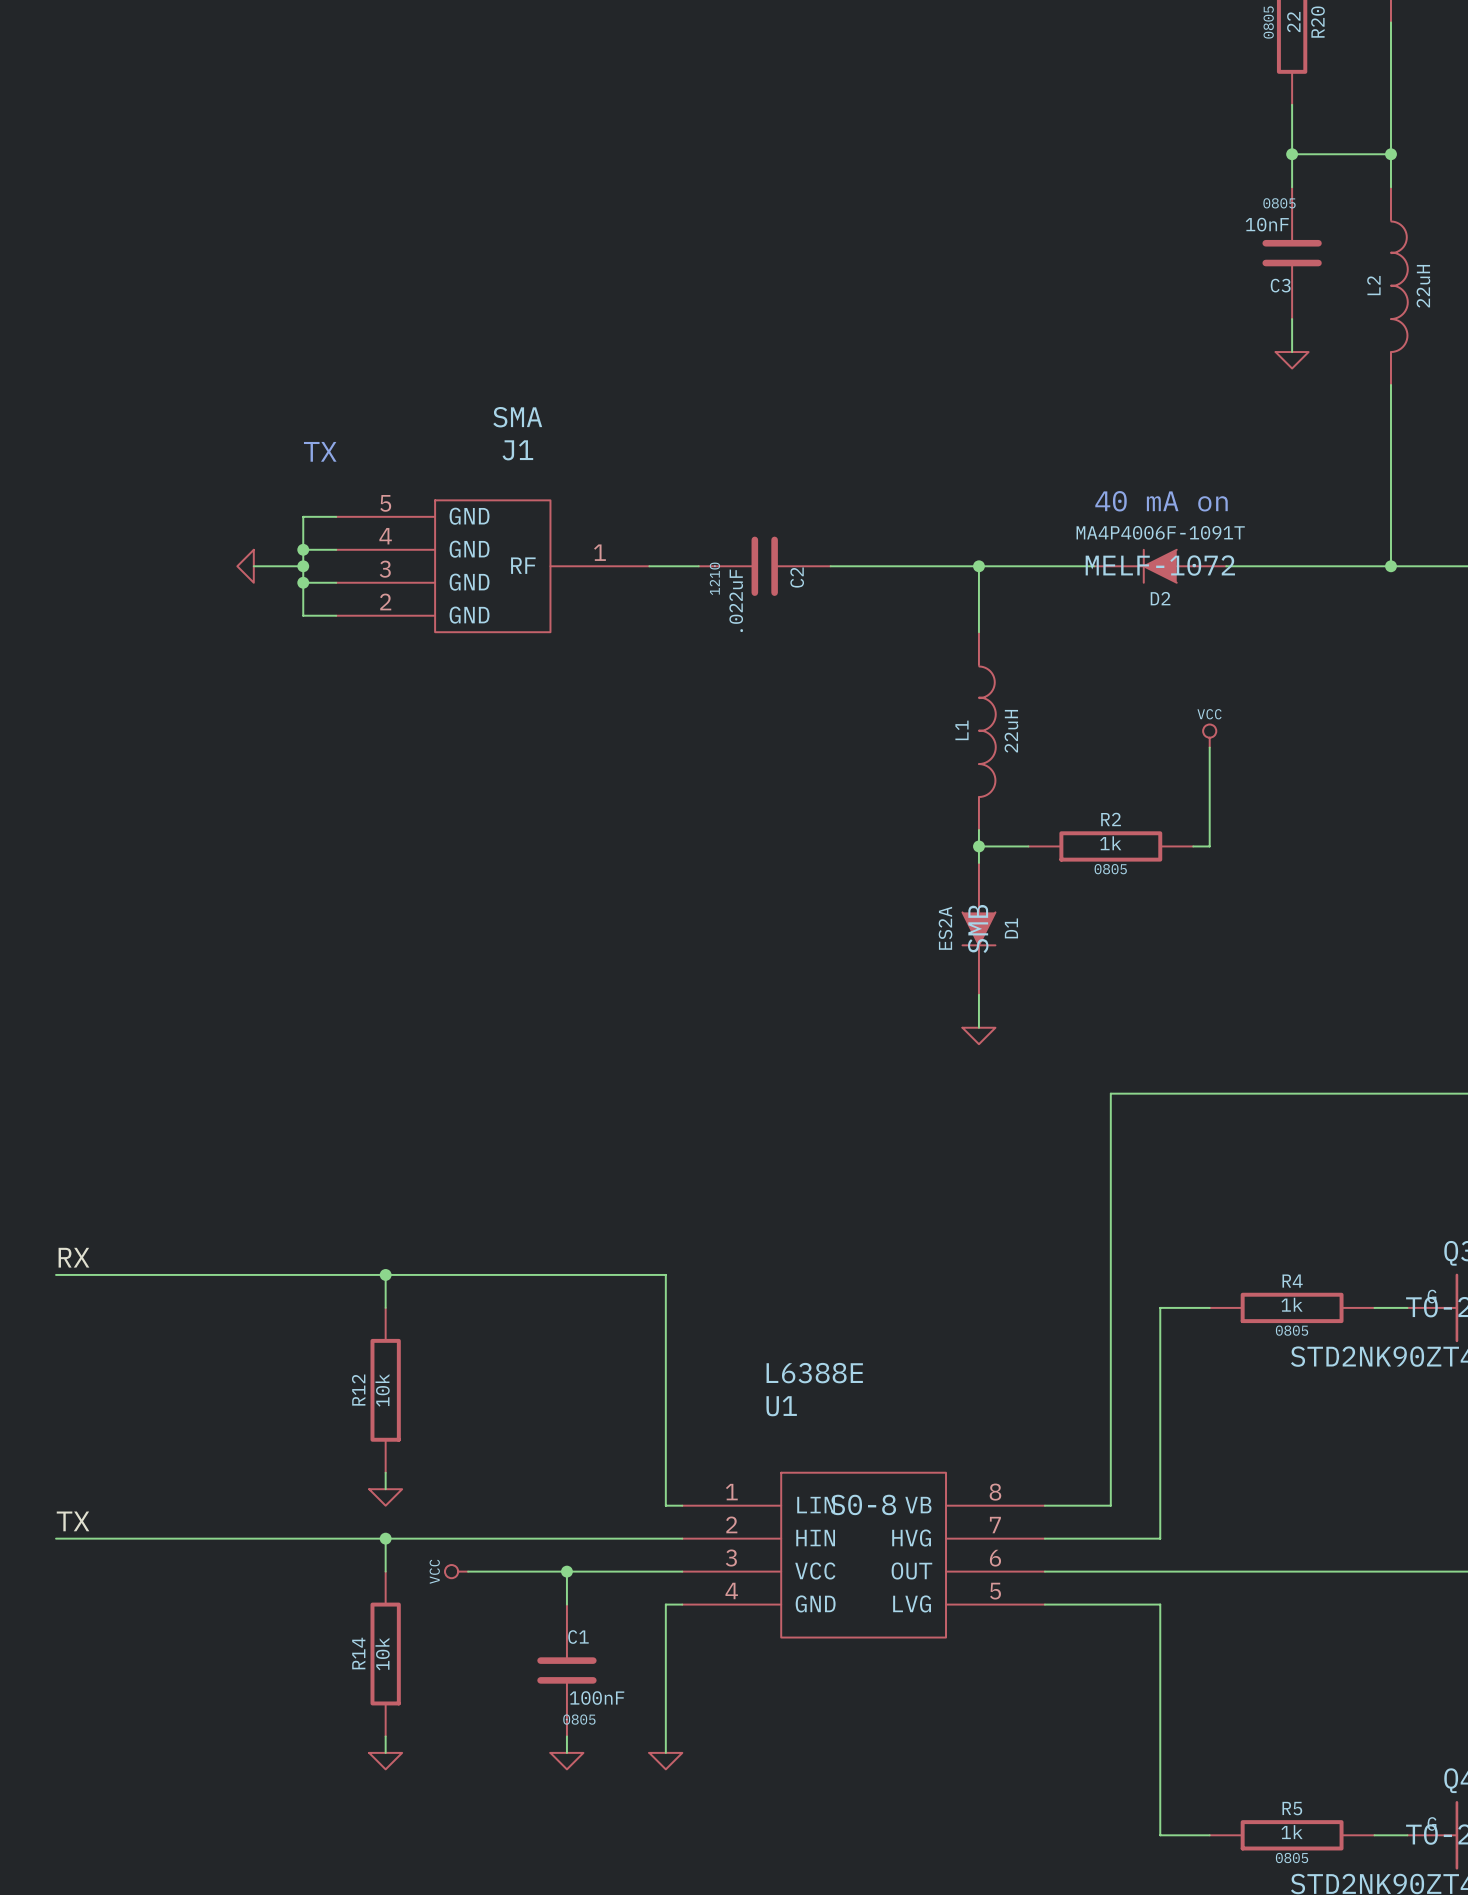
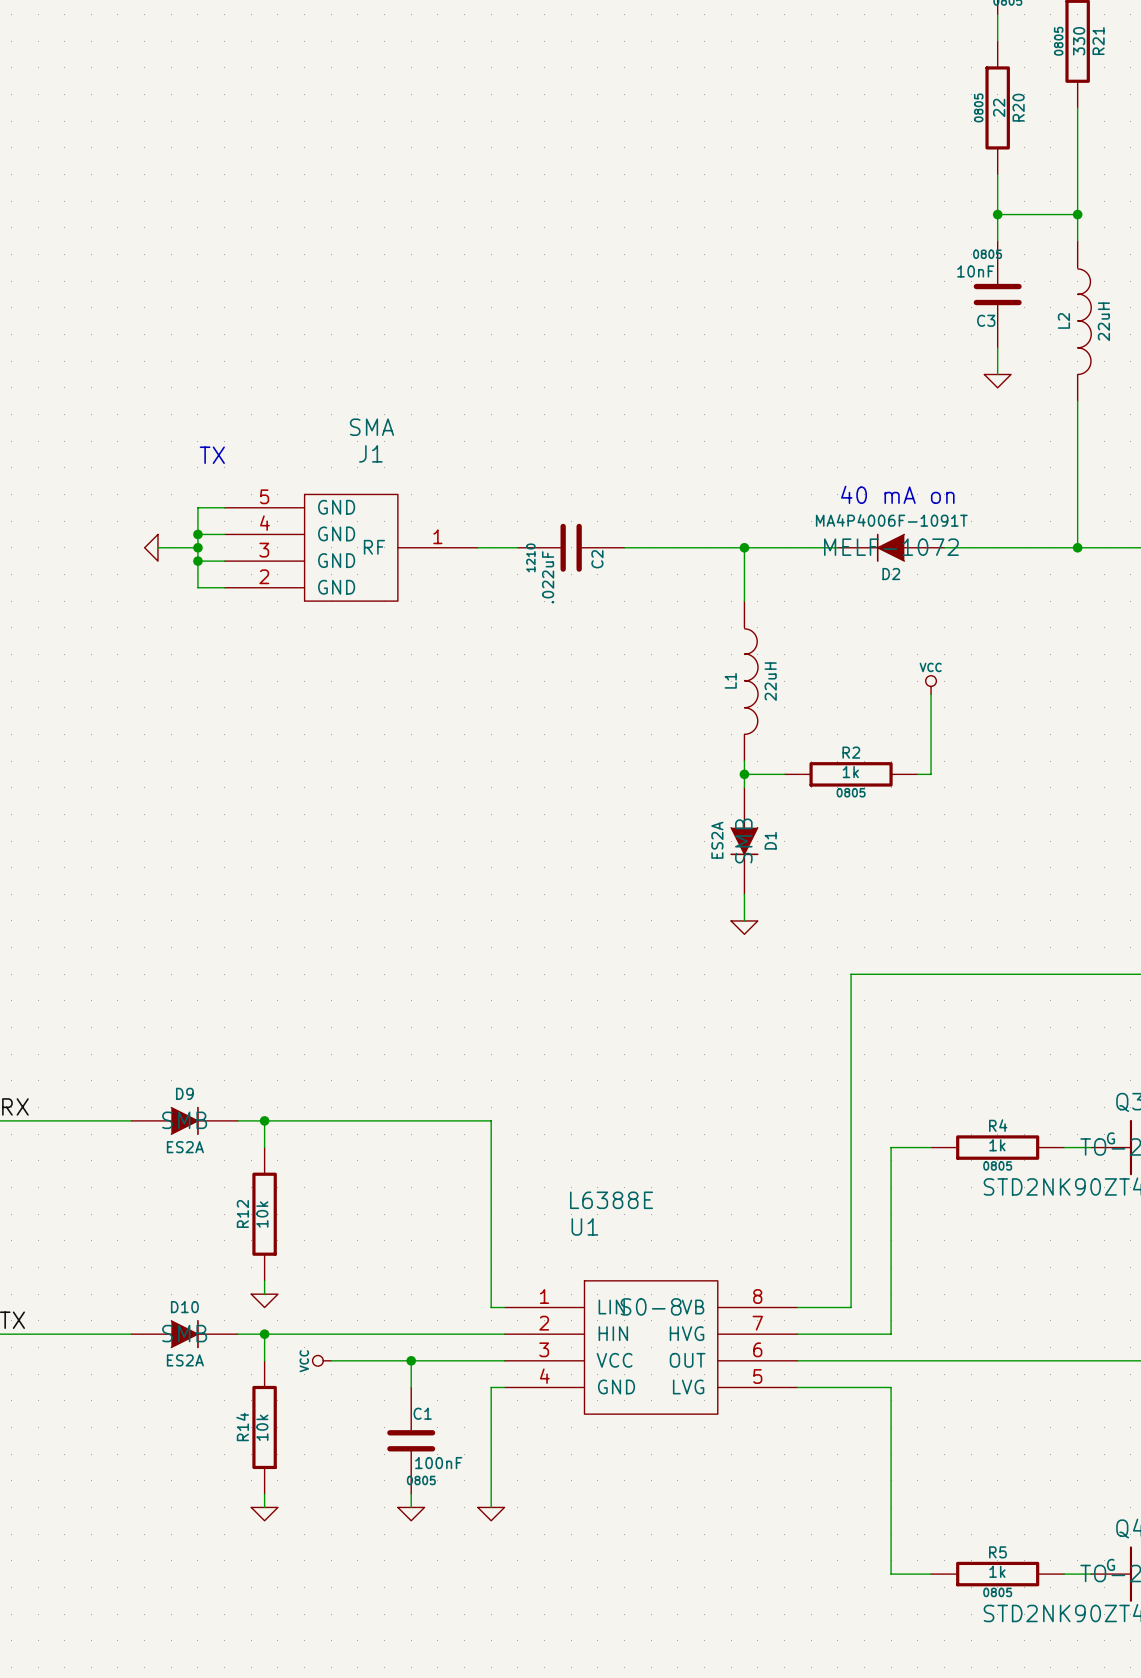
D9: none -> ES2A (184, 1120)
D10: none -> ES2A (184, 1334)

